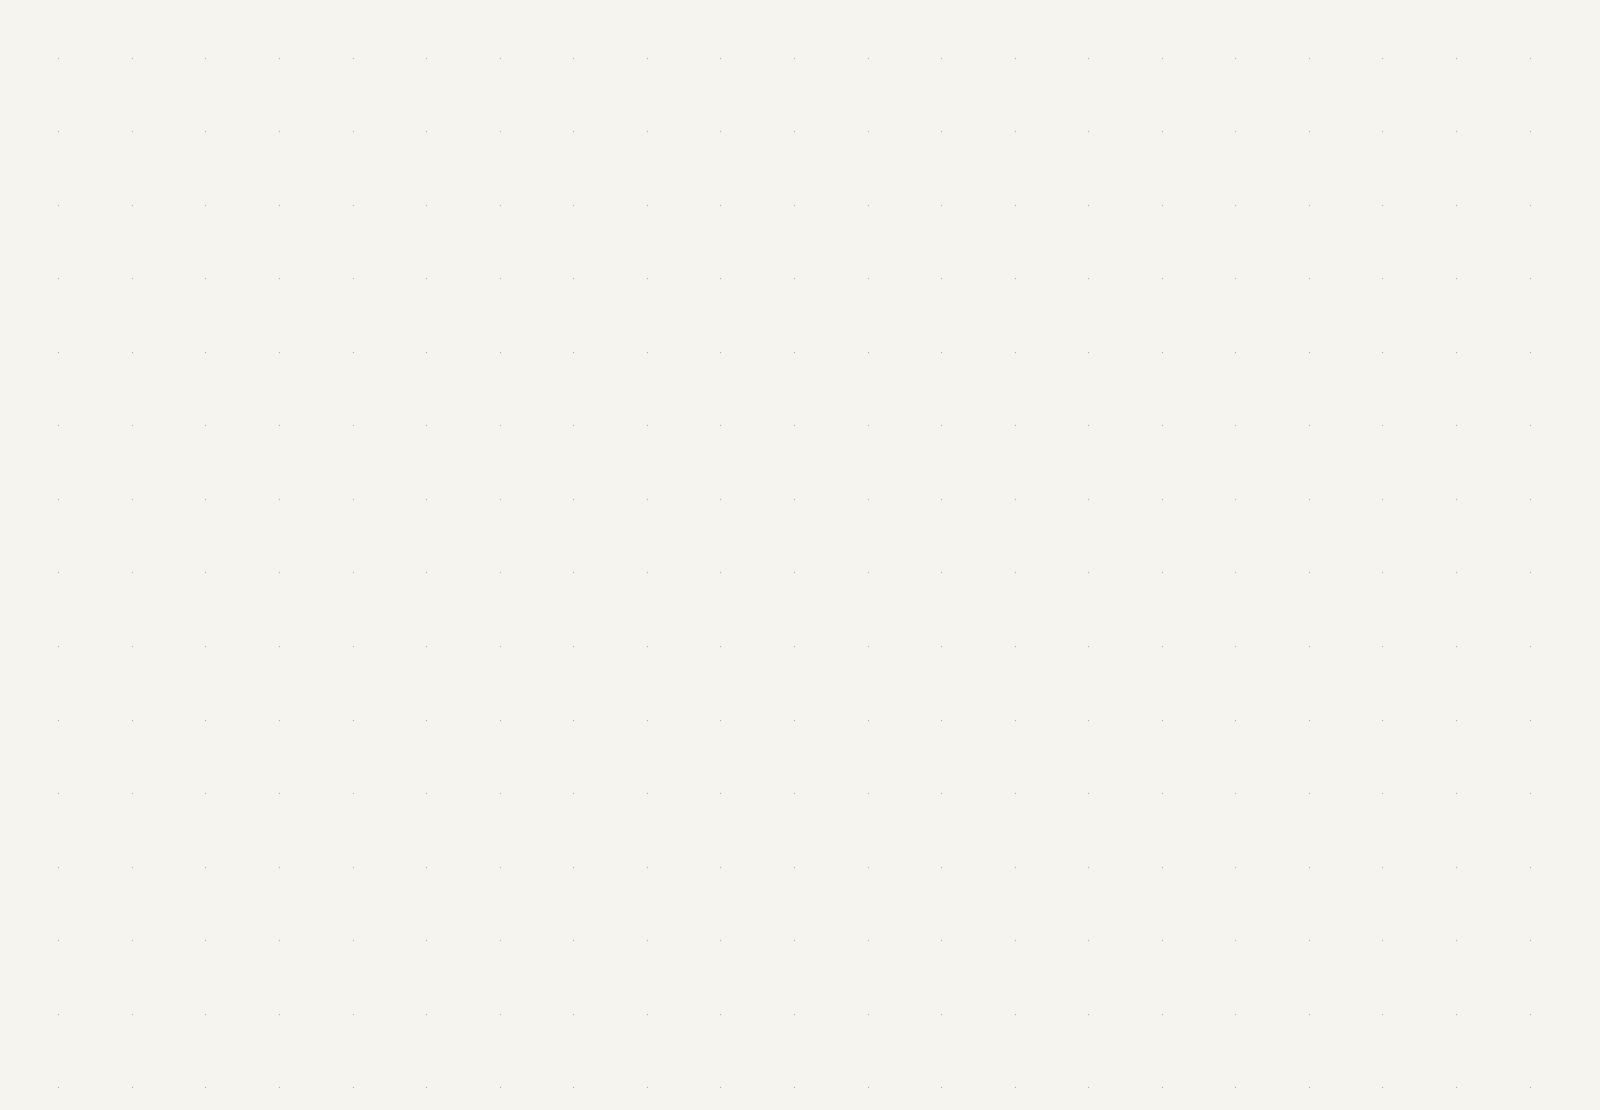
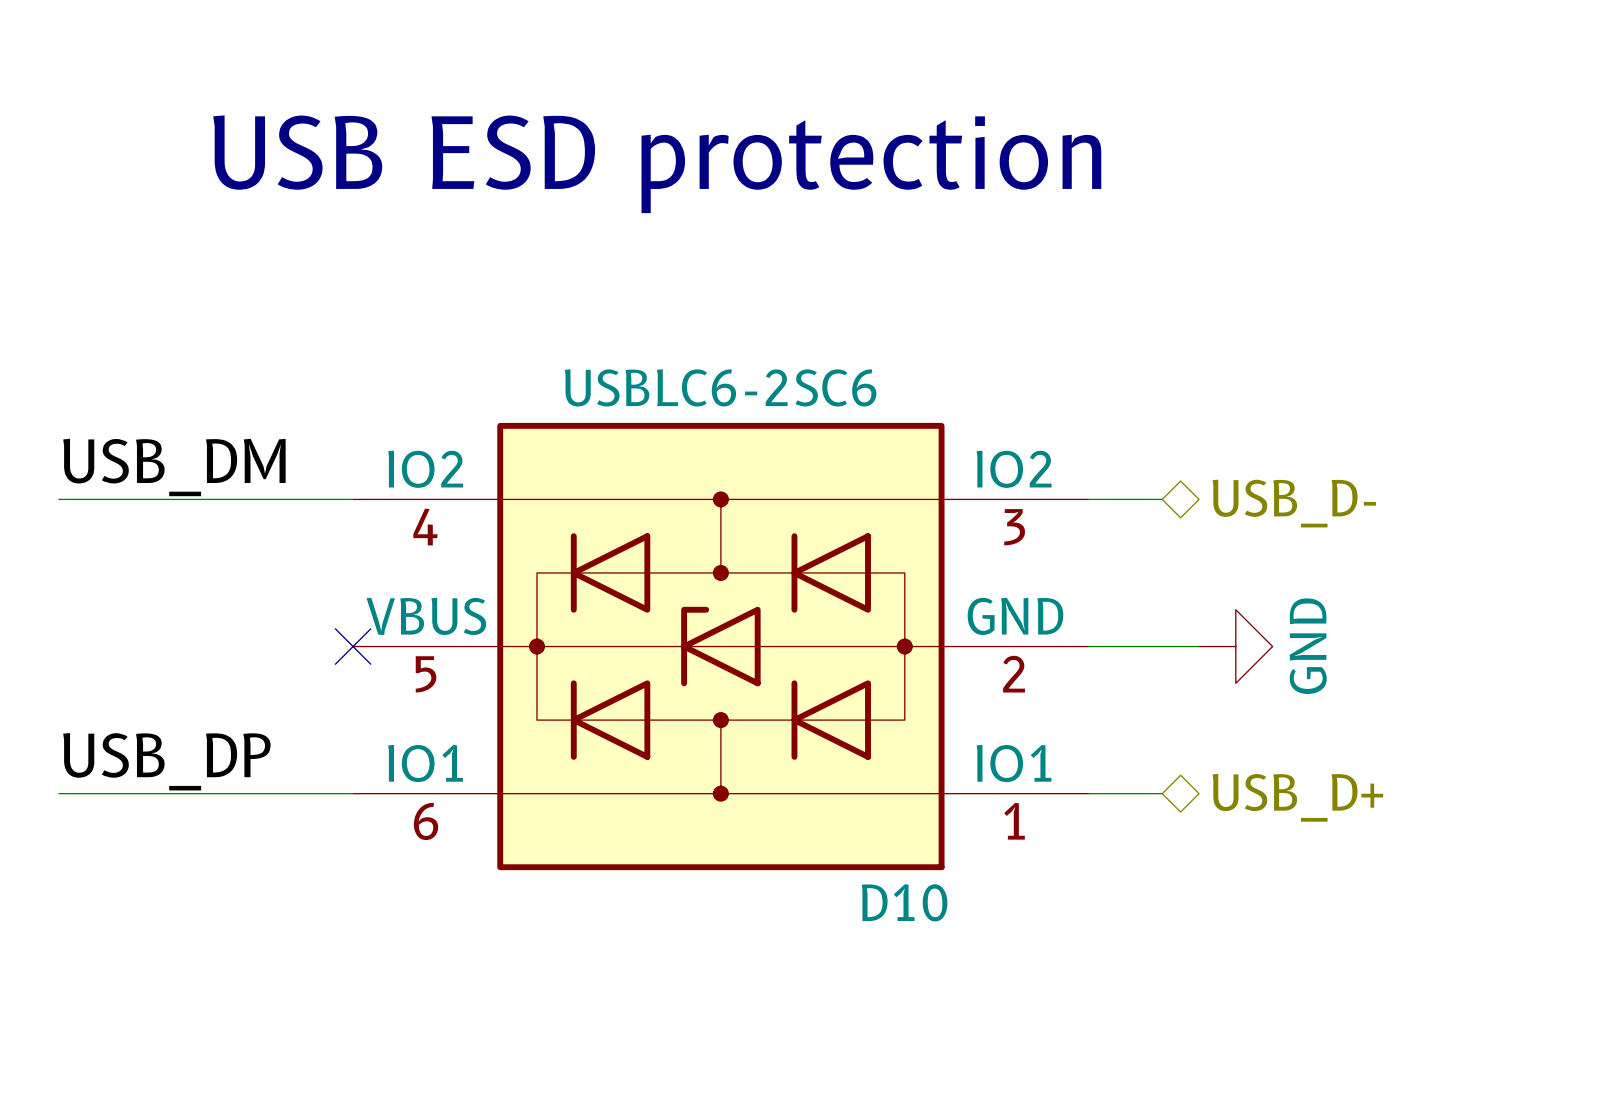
text: none -> USB ESD protection (657, 164)
label: none -> USB_DM (174, 467)
wire: none -> (58, 499) (353, 499)
wire: none -> (1088, 499) (1162, 499)
hierarchical label: none -> USB_D- (1294, 503)
no-connect mark: none -> (353, 646)
D10: none -> USBLC6-2SC6 (720, 646)
wire: none -> (1088, 646) (1199, 646)
power symbol: none -> GND (1235, 646)
label: none -> USB_DP (166, 761)
wire: none -> (58, 793) (353, 793)
wire: none -> (1088, 793) (1162, 793)
hierarchical label: none -> USB_D+ (1297, 797)

